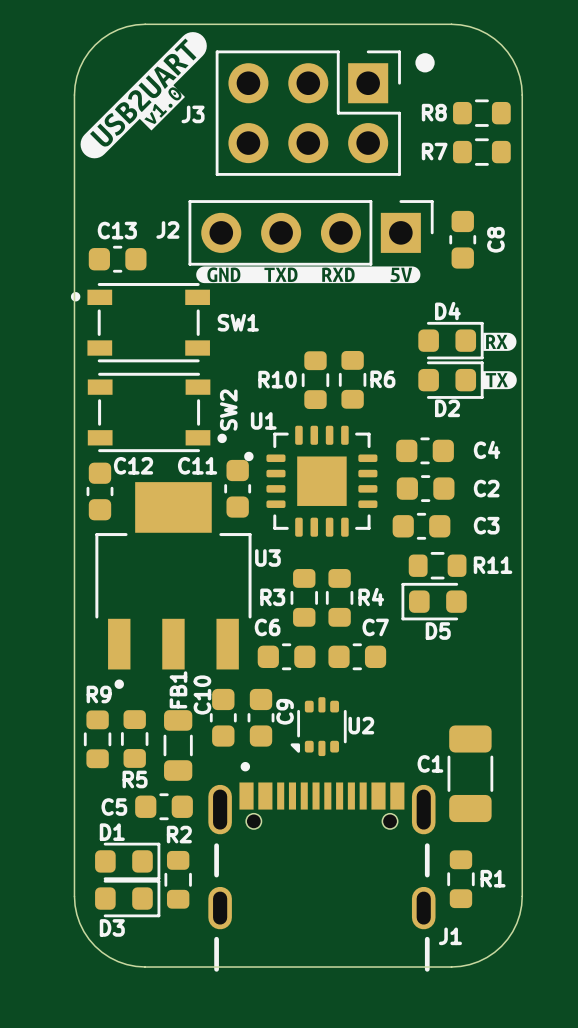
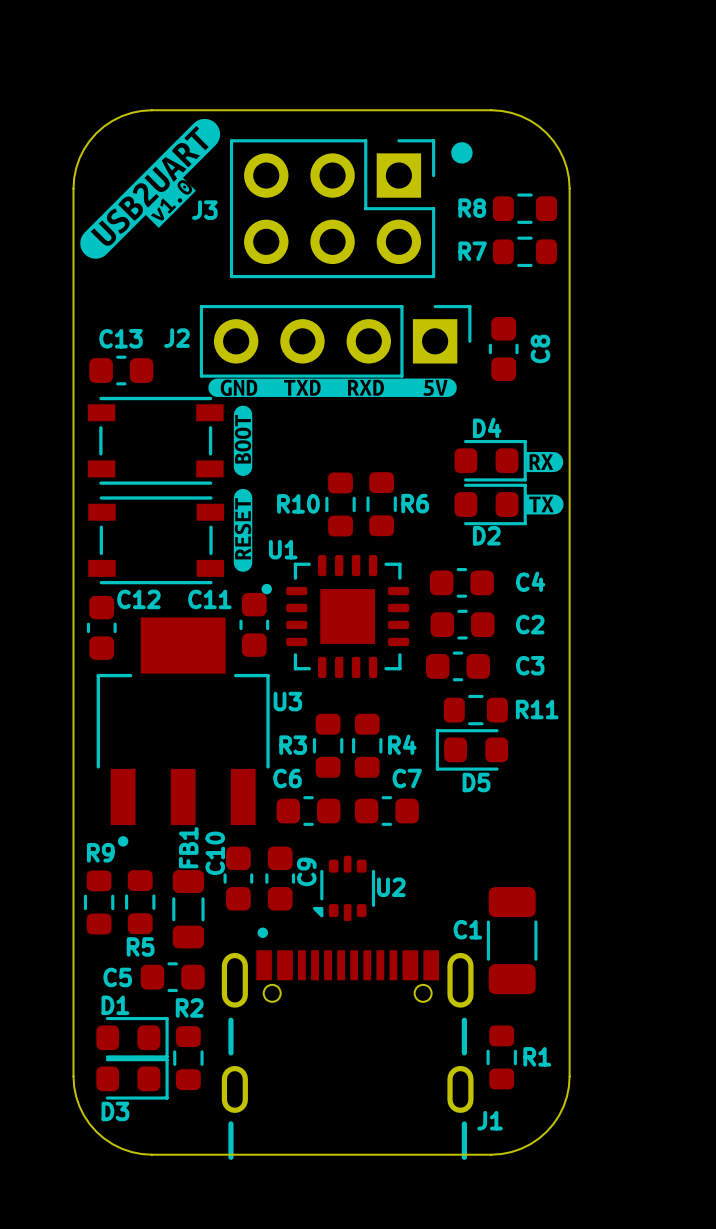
drawing: none -> [233, 405, 253, 572]
SW1: (140, 322) -> none
SW2: (157, 412) -> none

